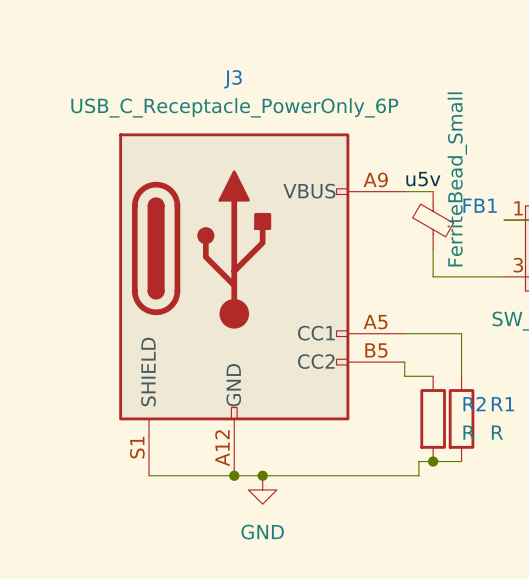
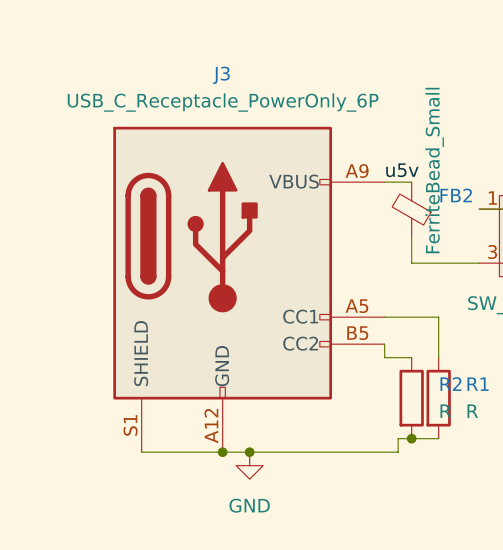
FB1 name: FB1 (480, 205) -> FB2 (456, 195)

